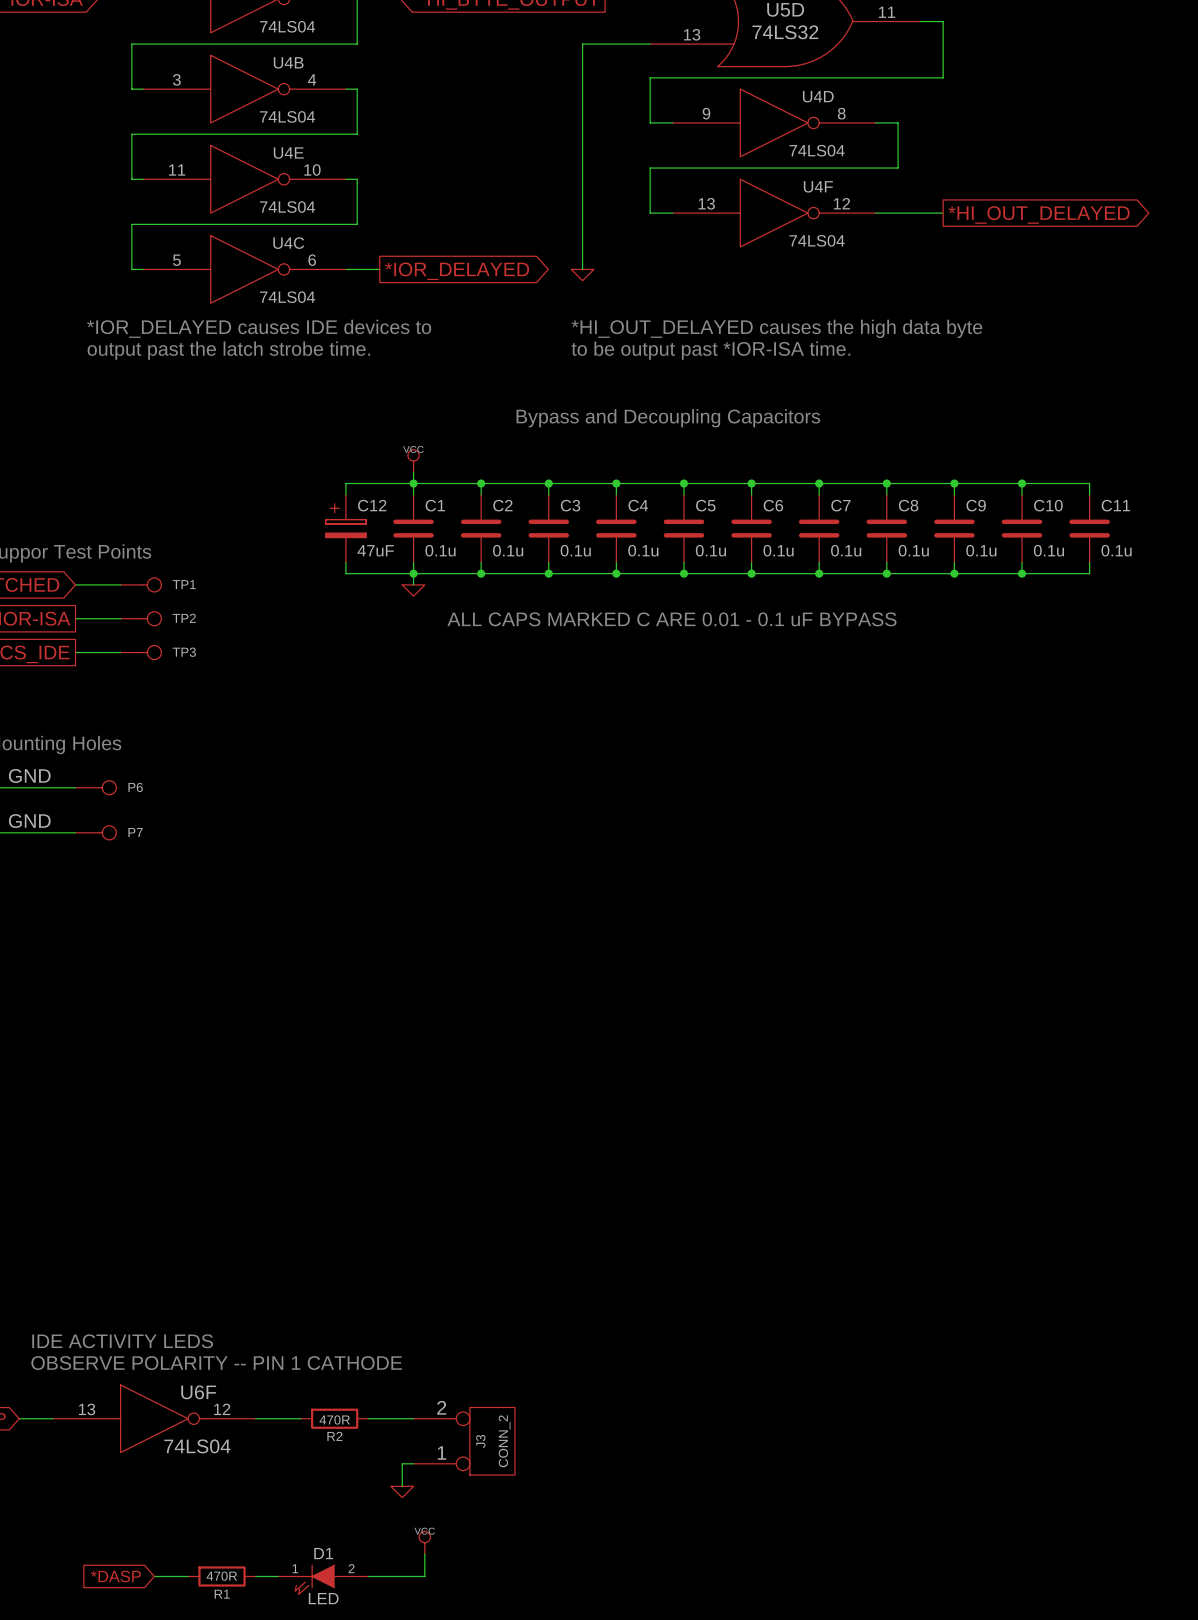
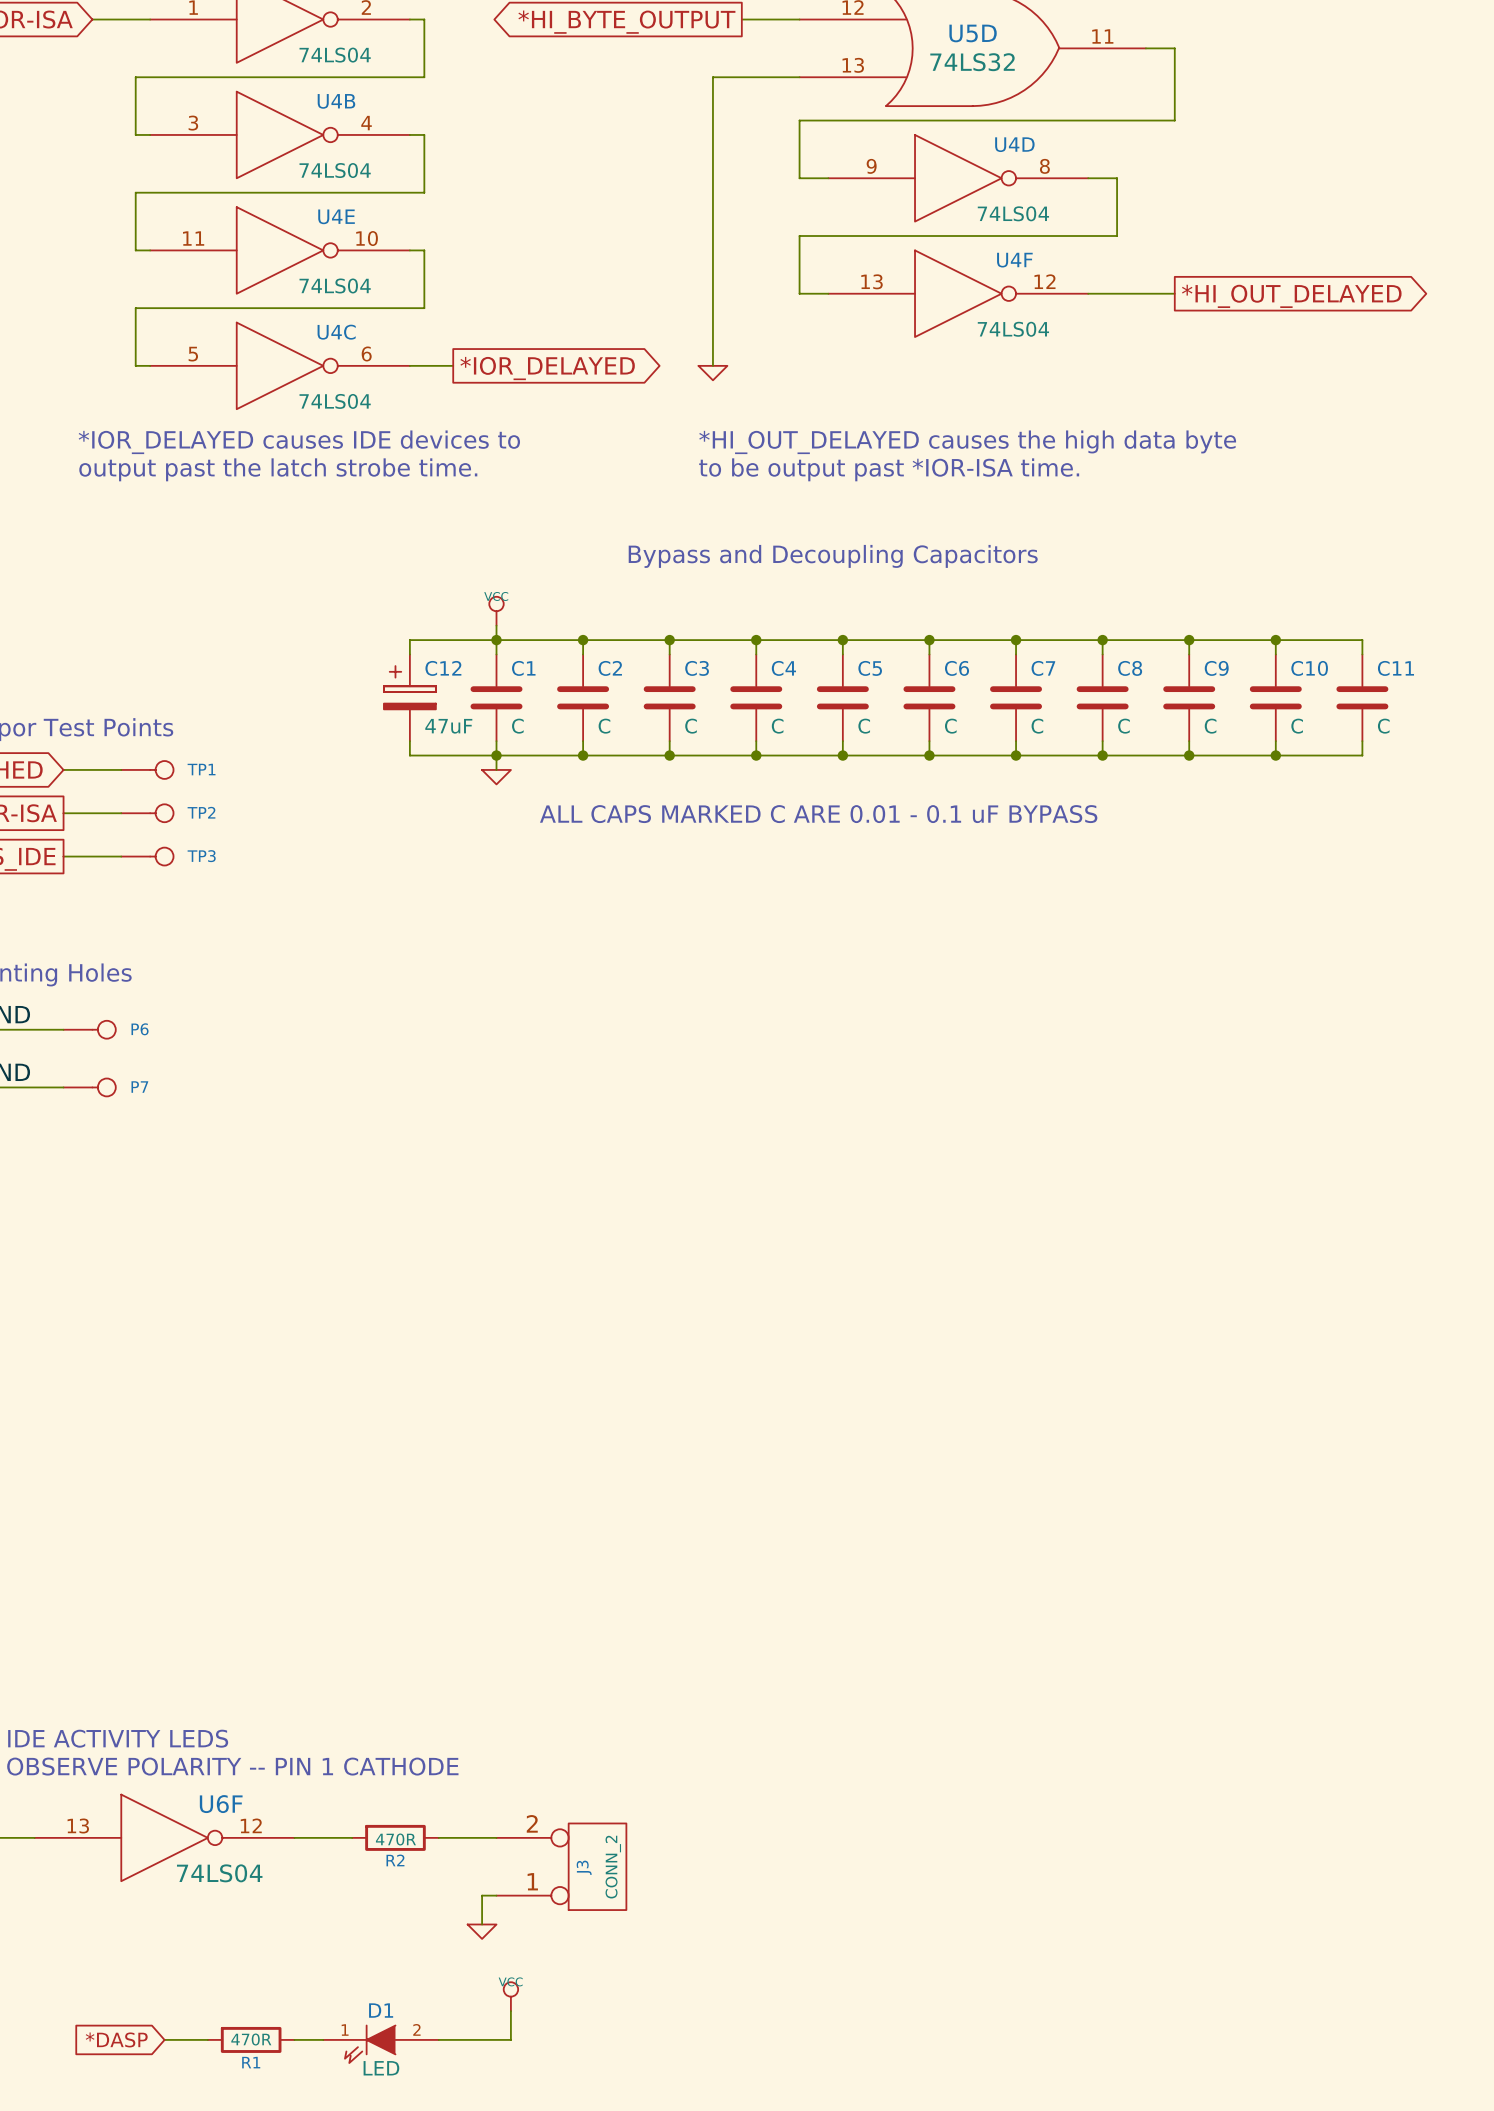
C1 value: 0.1u (440, 550) -> C (517, 726)
C2 value: 0.1u (508, 550) -> C (604, 726)
C3 value: 0.1u (575, 550) -> C (691, 726)
C4 value: 0.1u (643, 550) -> C (777, 726)
C5 value: 0.1u (710, 550) -> C (864, 726)
C6 value: 0.1u (778, 550) -> C (950, 726)
C7 value: 0.1u (846, 550) -> C (1037, 726)
C8 value: 0.1u (913, 550) -> C (1123, 726)
C9 value: 0.1u (981, 550) -> C (1210, 726)
C10 value: 0.1u (1048, 550) -> C (1297, 726)
C11 value: 0.1u (1116, 550) -> C (1383, 726)

